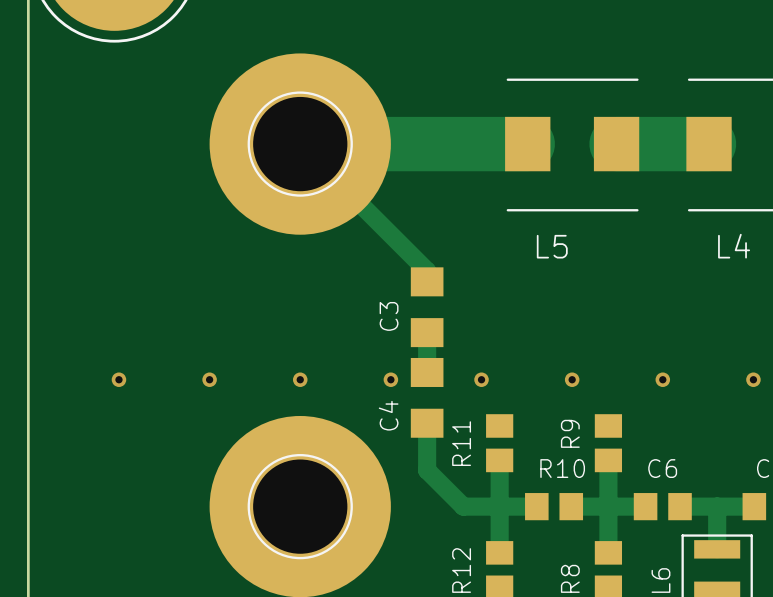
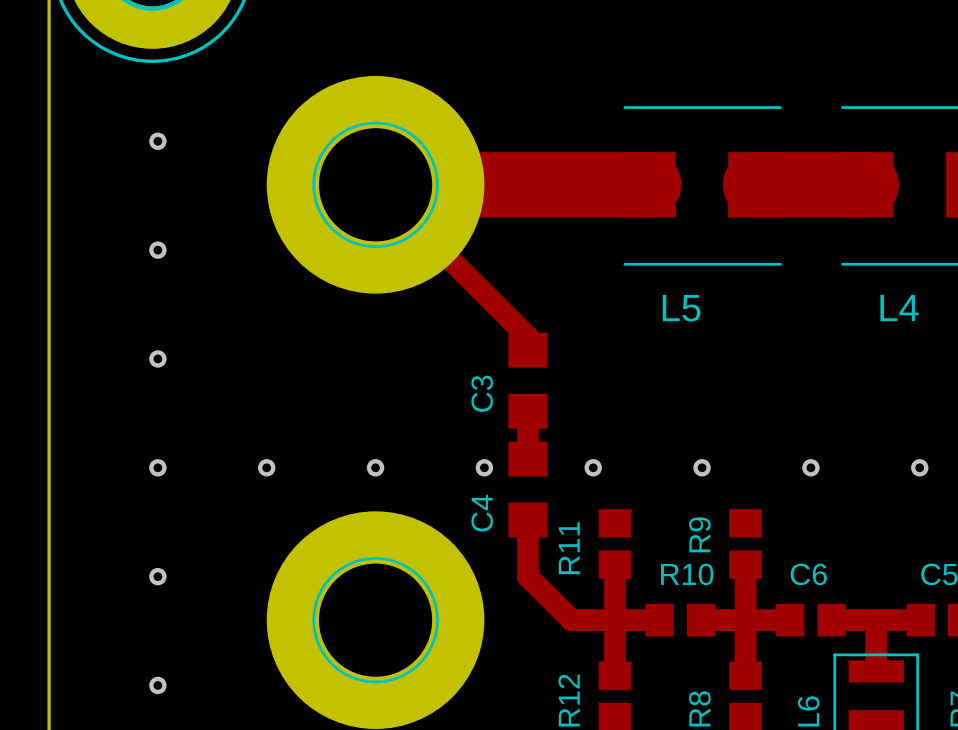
via: none -> (157, 141)
via: none -> (157, 250)
via: none -> (157, 358)
via: none -> (157, 576)
via: none -> (157, 685)

